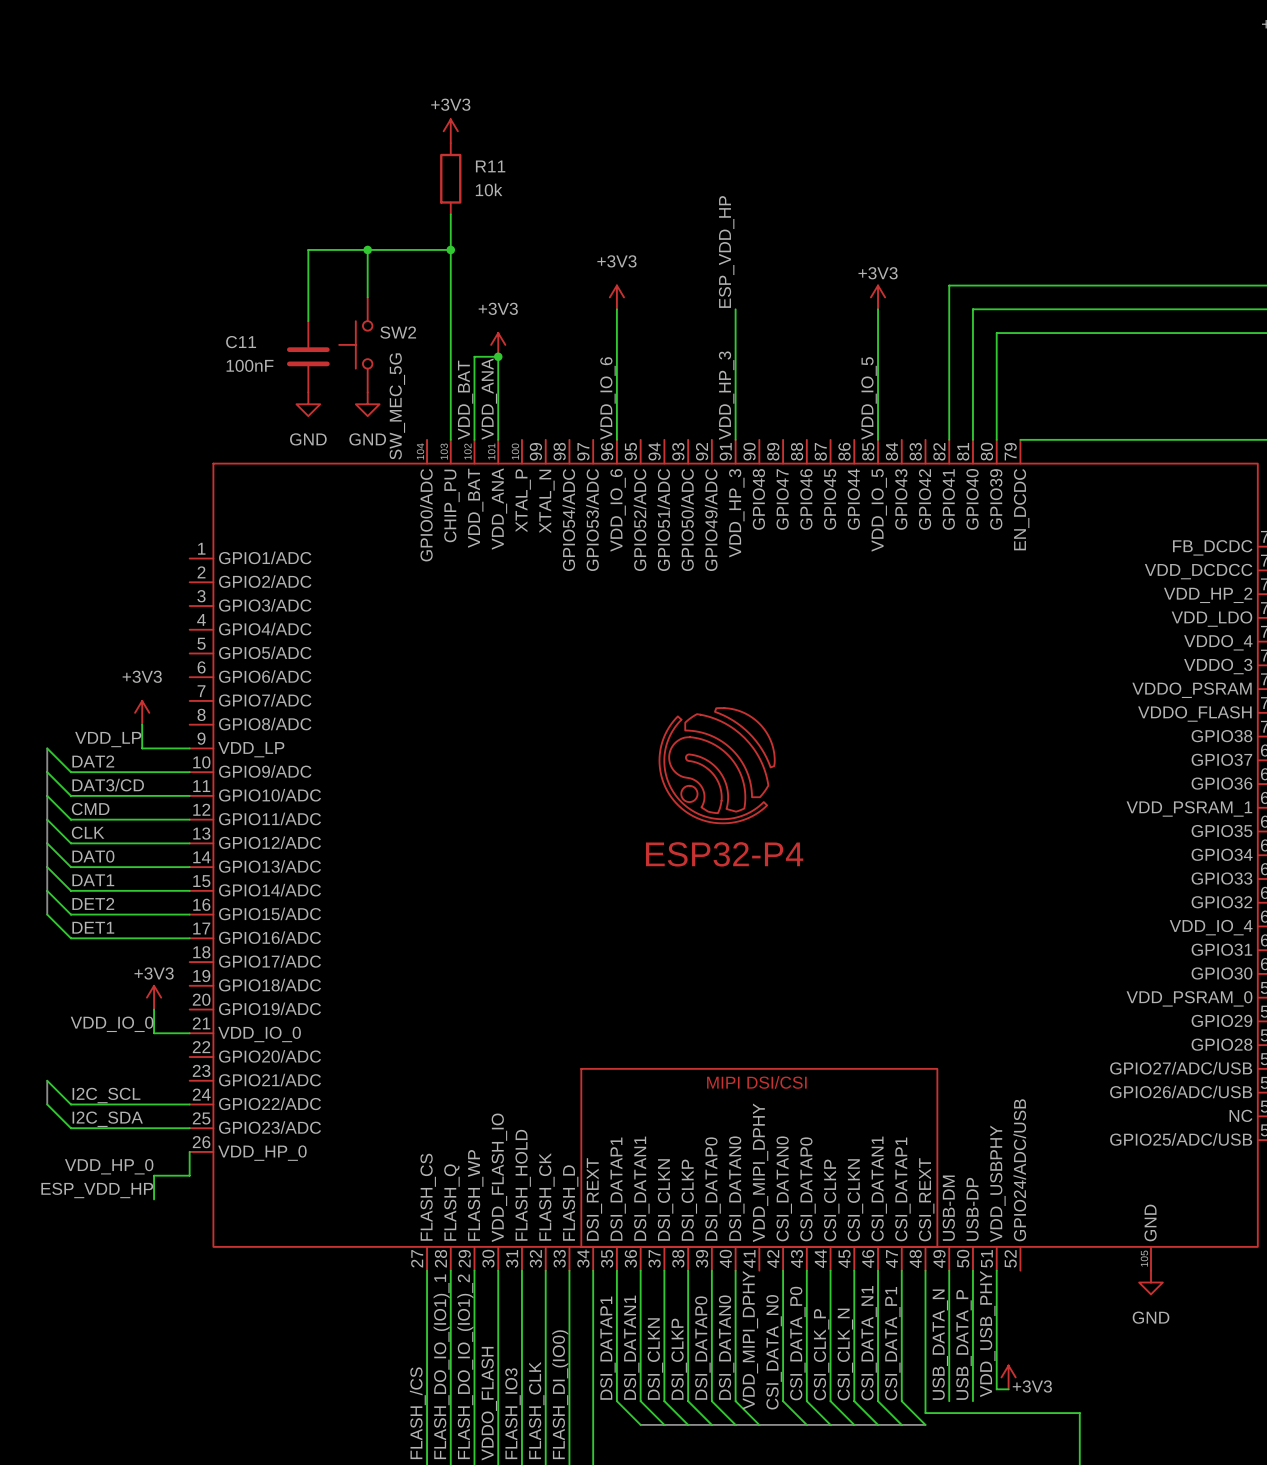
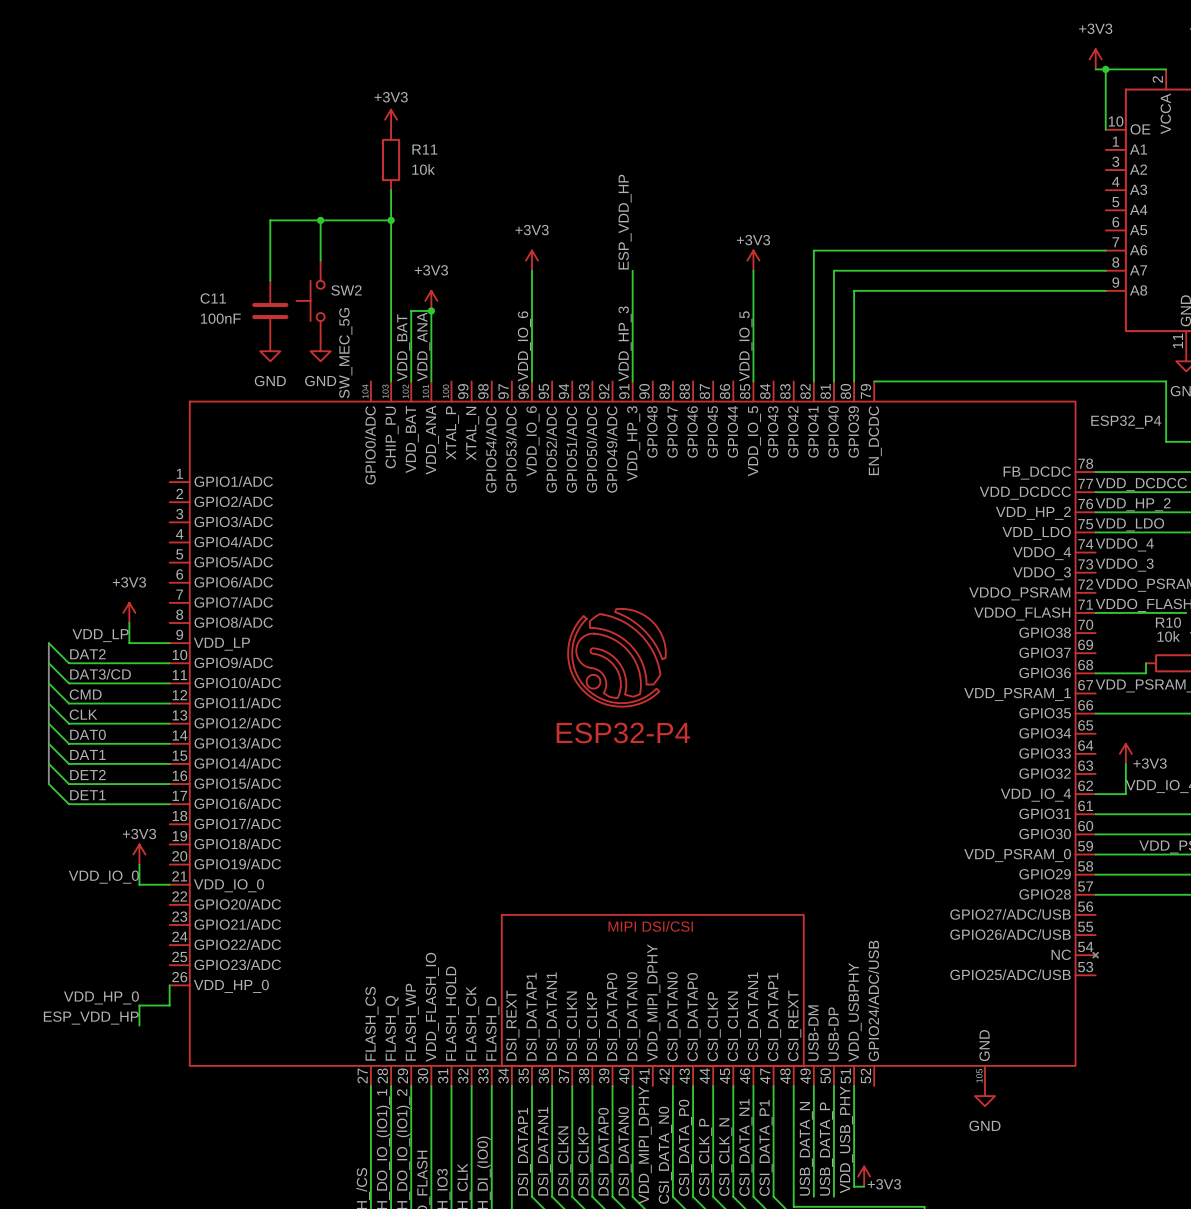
wire: (47, 1080) (70, 1104) (189, 1104) -> none
bus: (47, 1080) (47, 1104) -> none
label: I2C_SCL (106, 1095) -> none
wire: (47, 1104) (70, 1128) (189, 1128) -> none
label: I2C_SDA (107, 1119) -> none

